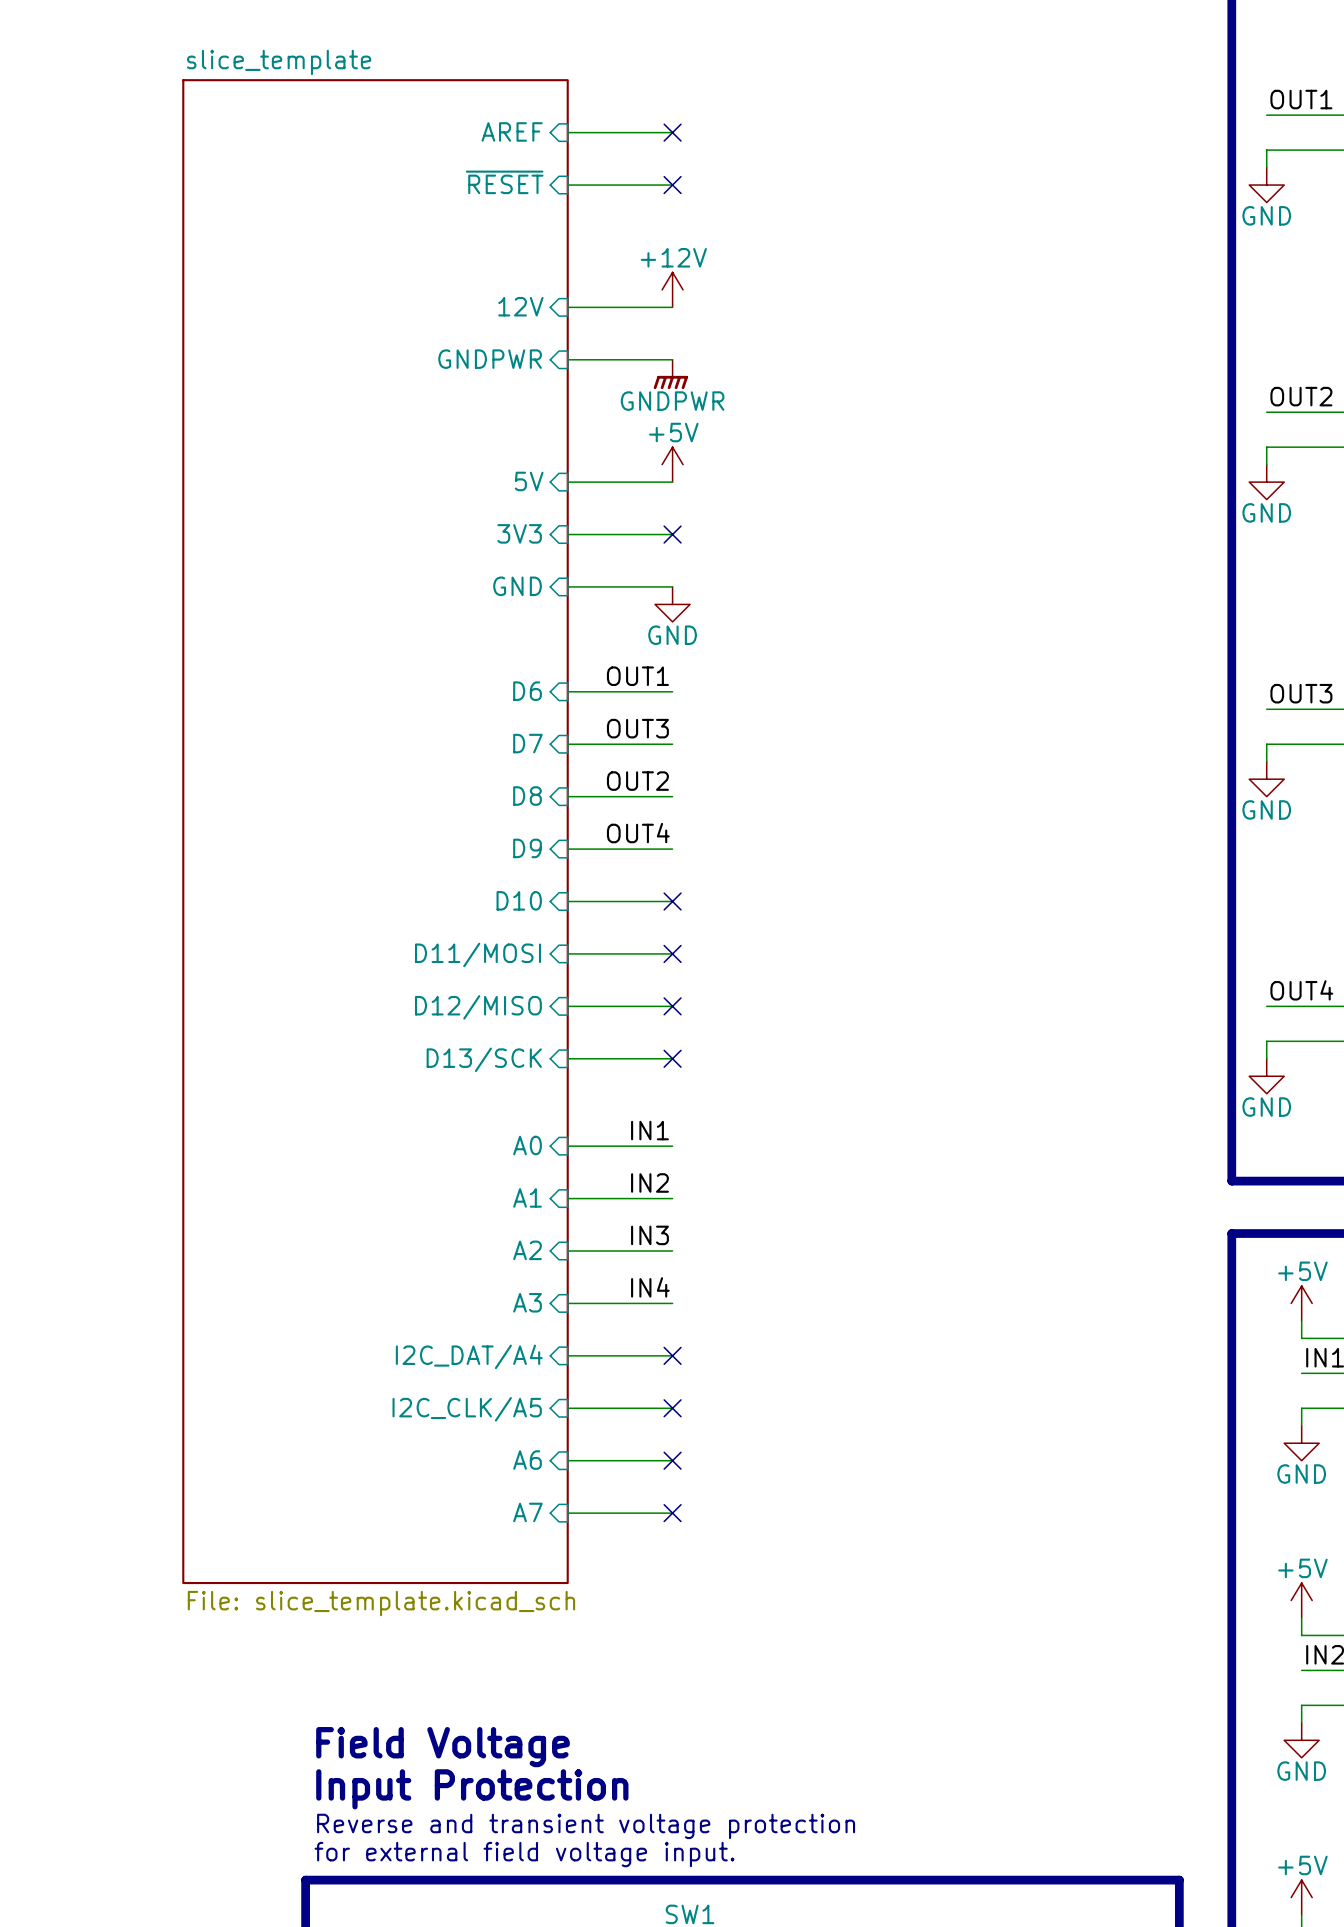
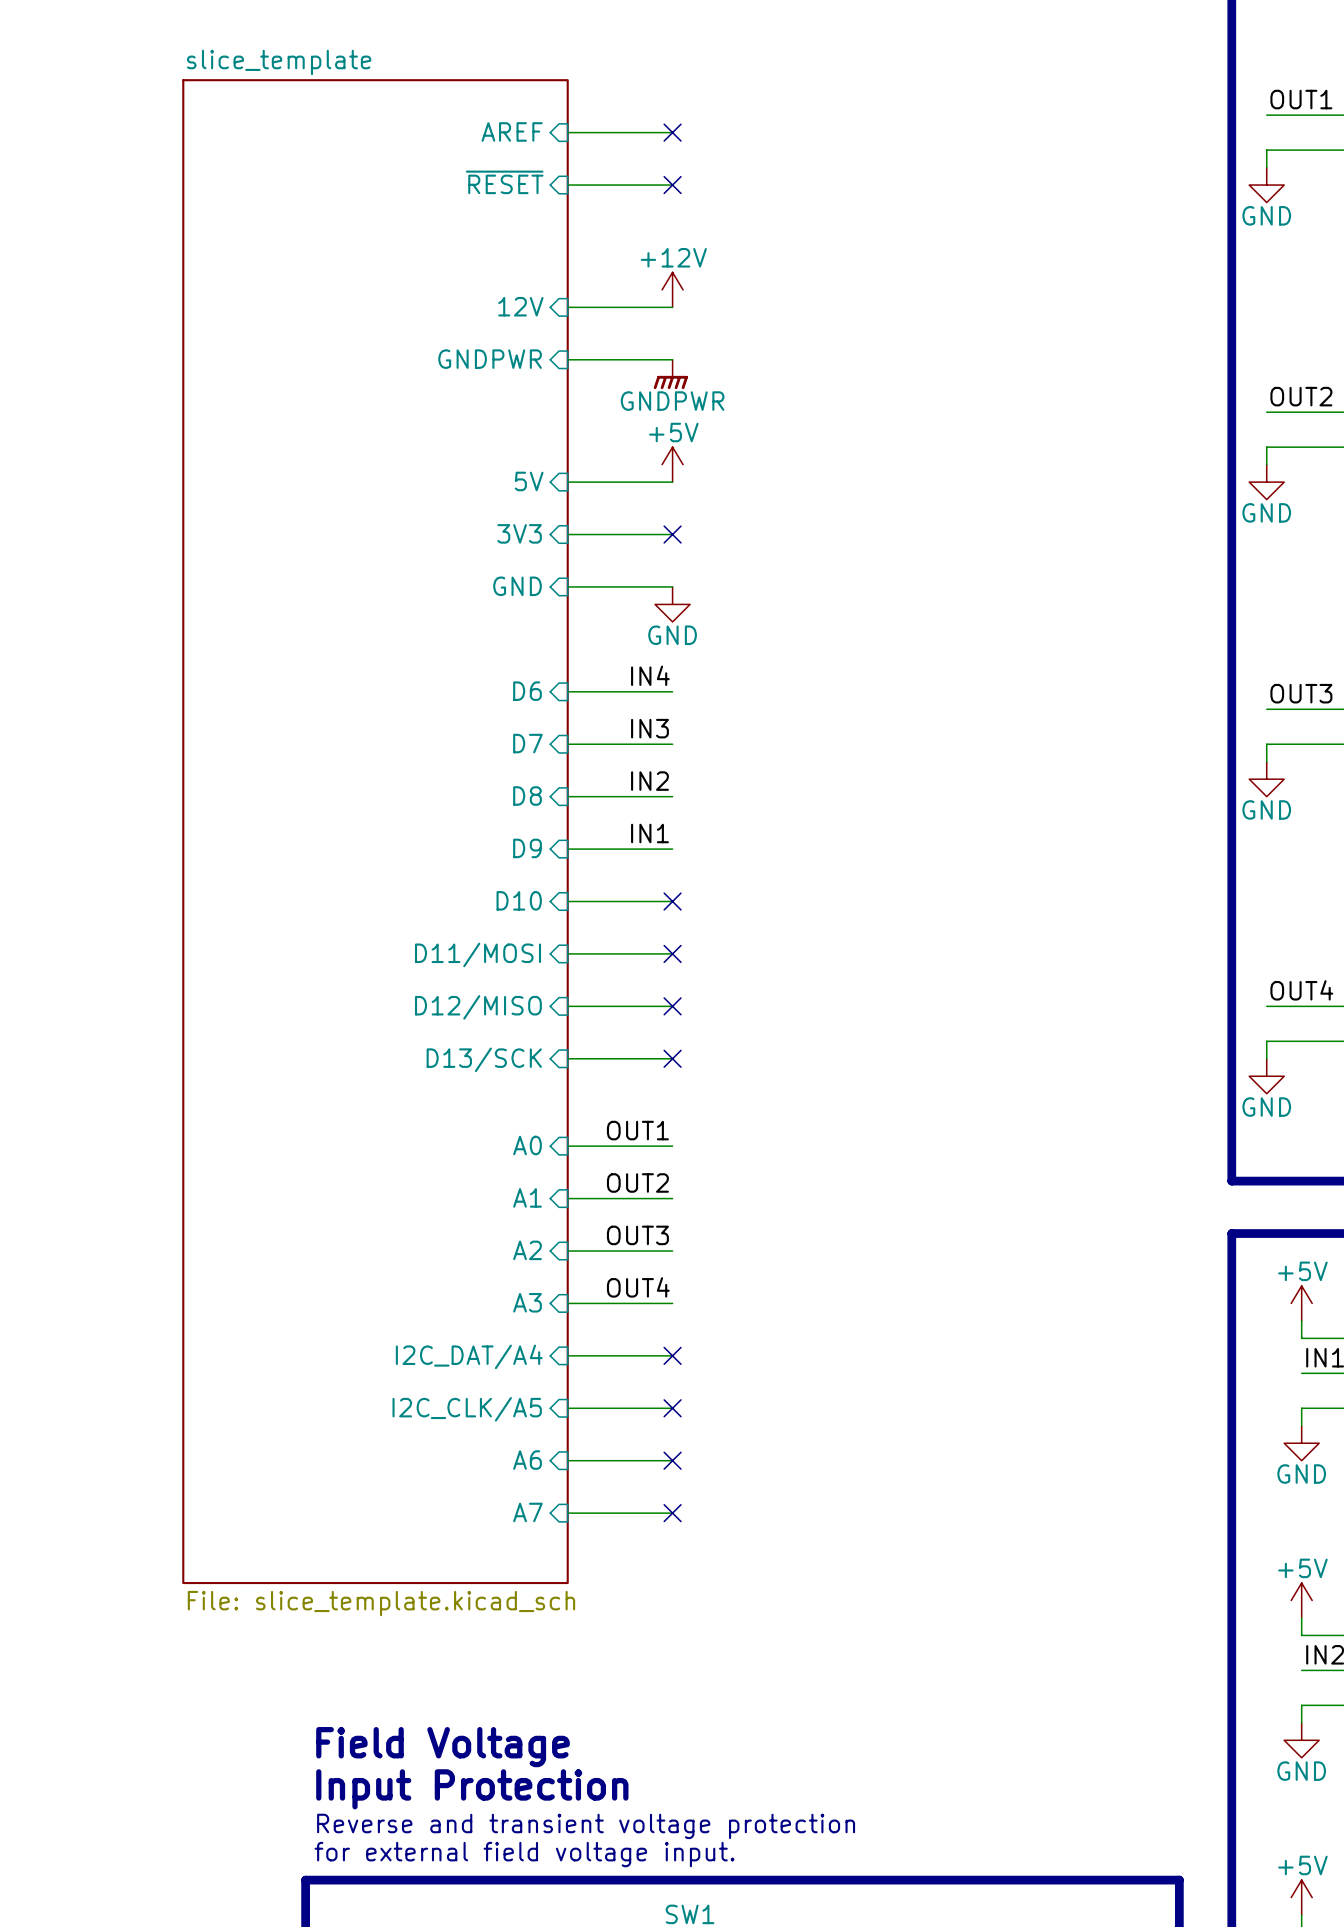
label: OUT1 (637, 676) -> IN4 (650, 675)
label: OUT3 (637, 728) -> IN3 (649, 728)
label: OUT2 (637, 781) -> IN2 (649, 781)
label: OUT4 (638, 833) -> IN1 (649, 833)
label: IN1 (649, 1130) -> OUT1 (637, 1130)
label: IN2 (649, 1182) -> OUT2 (637, 1182)
label: IN3 (649, 1235) -> OUT3 (637, 1235)
label: IN4 (650, 1287) -> OUT4 (638, 1287)

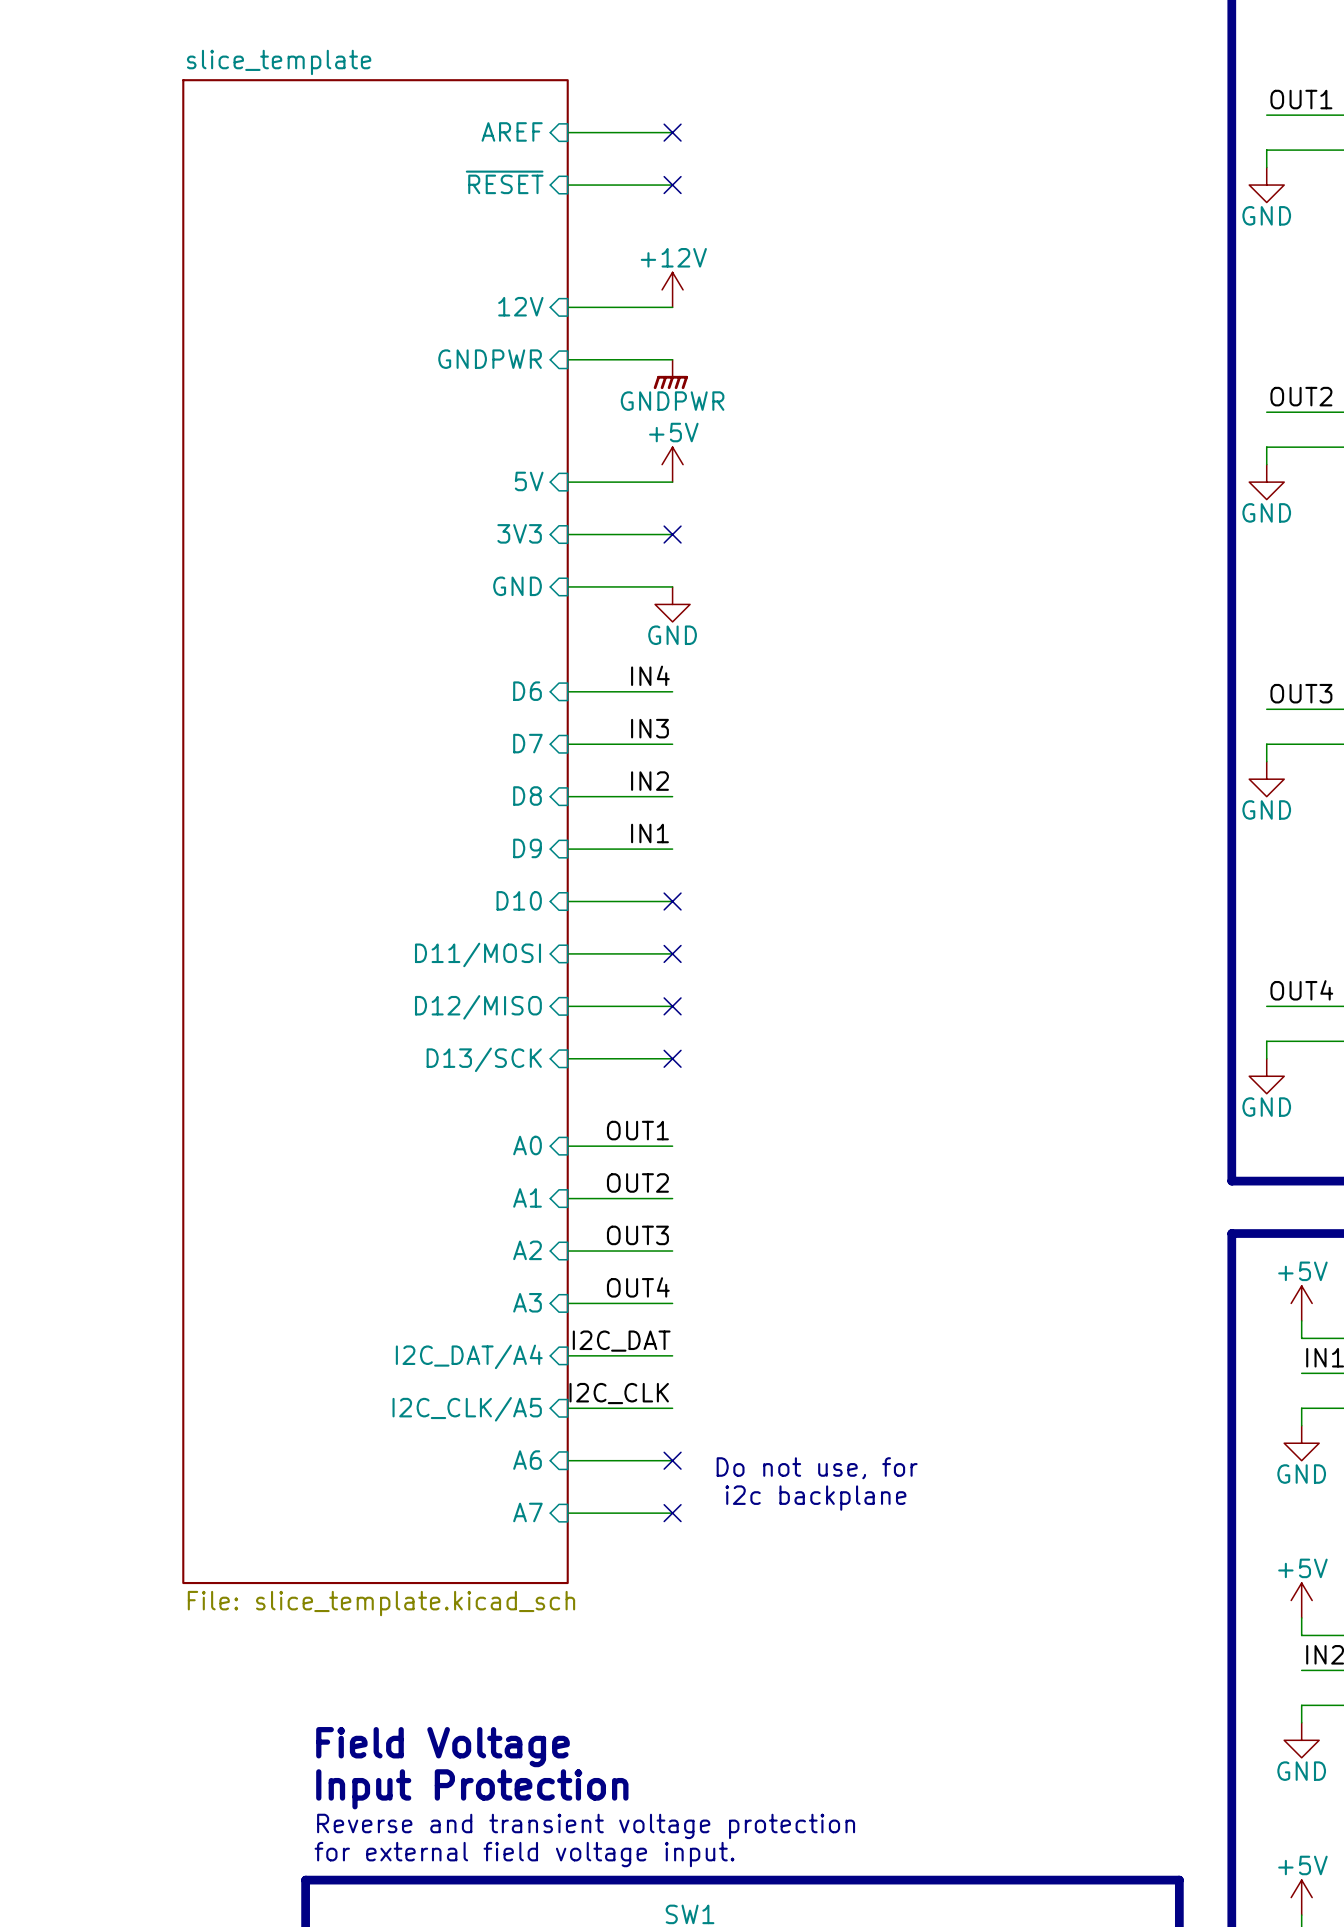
label: none -> I2C_DAT (621, 1341)
no-connect mark: (672, 1355) -> none
label: none -> I2C_CLK (619, 1393)
no-connect mark: (672, 1408) -> none
text: none -> Do not use, for (817, 1468)
text: none -> i2c backplane (815, 1498)

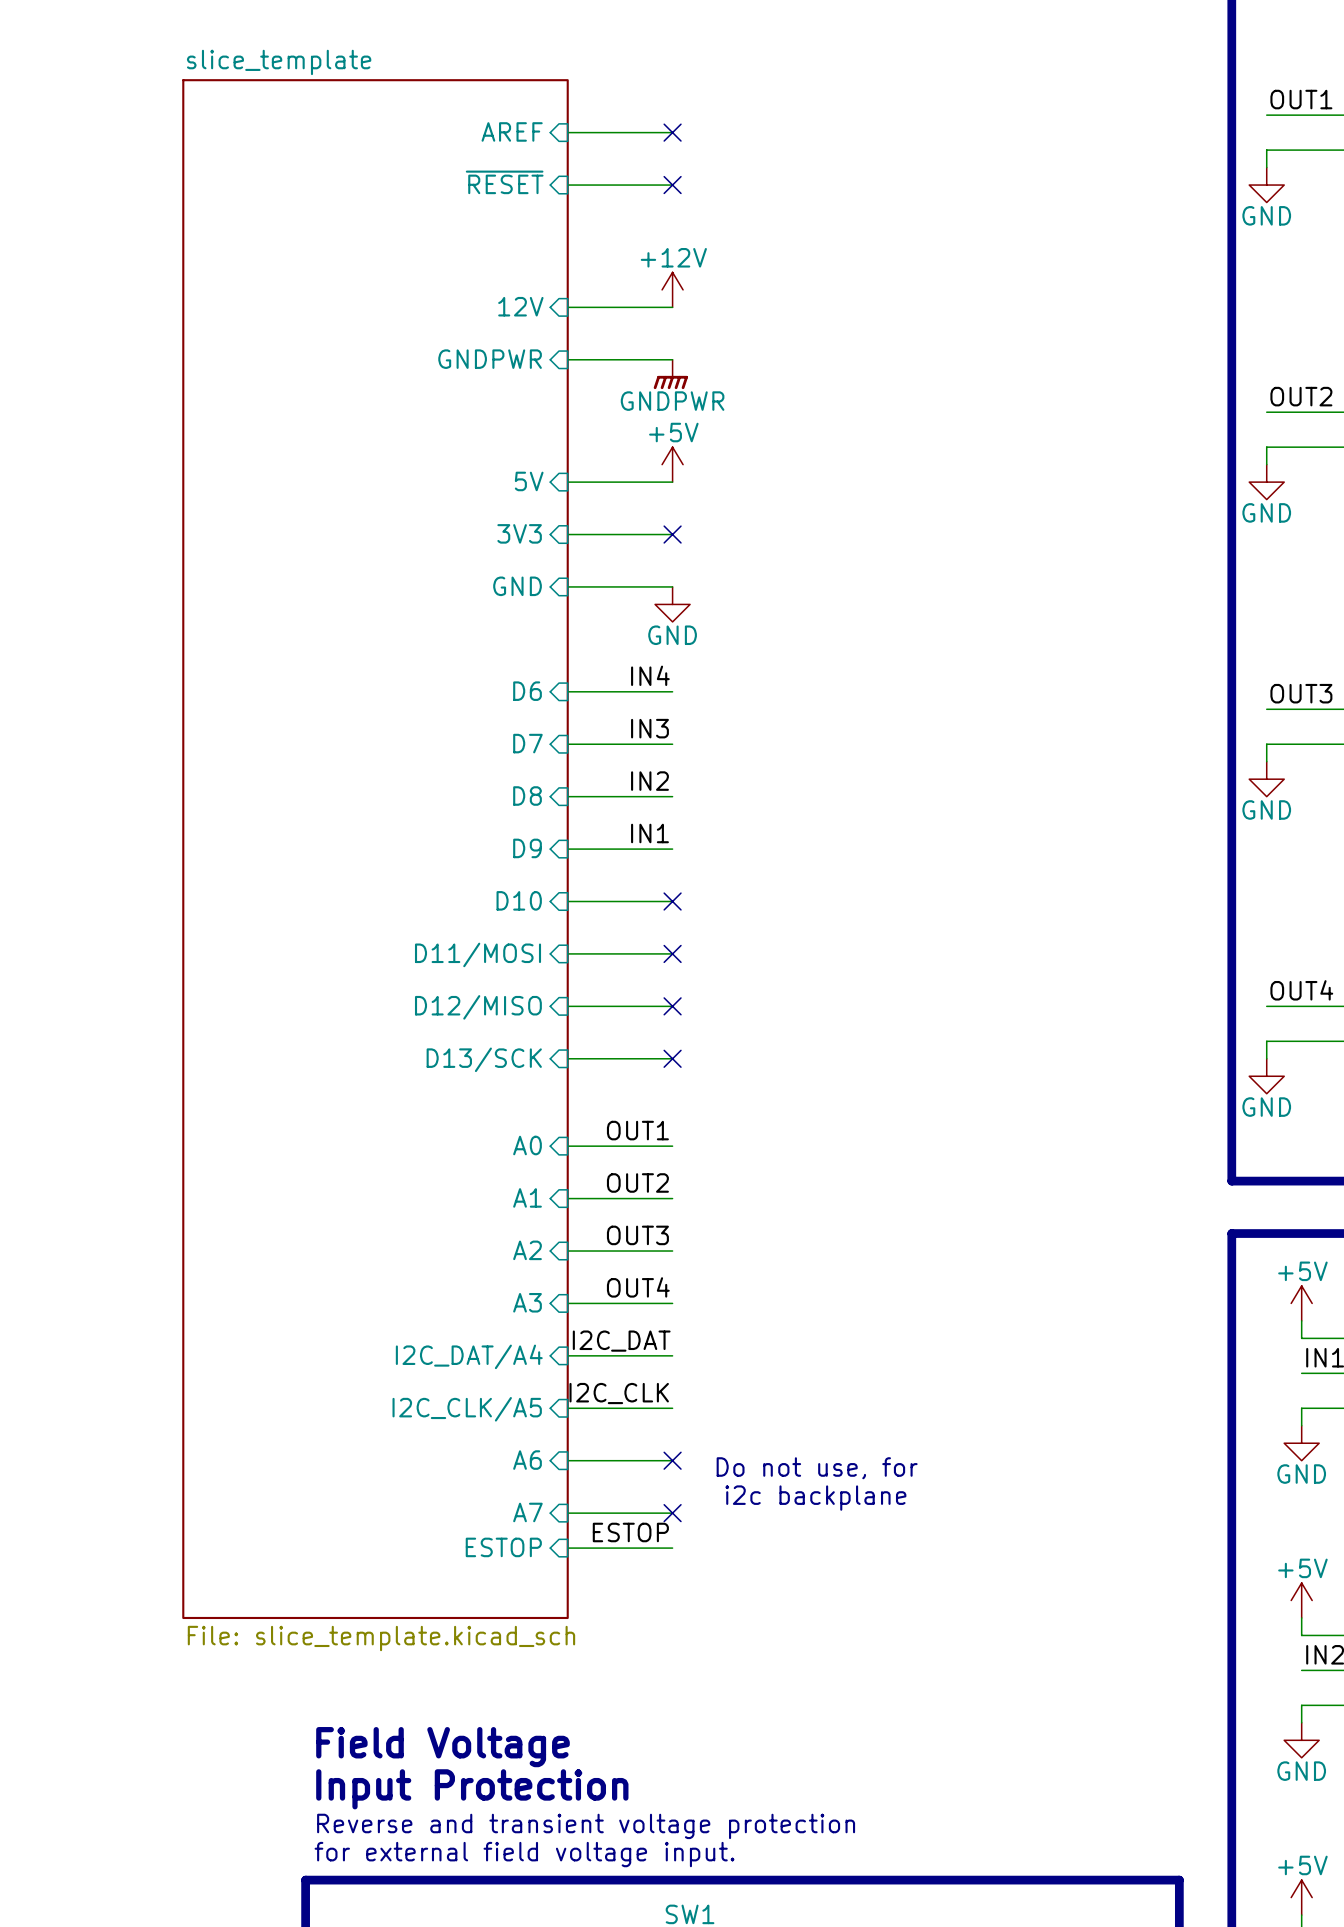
sheet slice_template: File: slice_template.kicad_sch (375, 831) -> none
sheet slice_template: none -> File: slice_template.kicad_sch (375, 849)
label: none -> ESTOP (630, 1532)
sheet pin: none -> ESTOP (503, 1547)
wire: none -> (567, 1548) (672, 1548)

